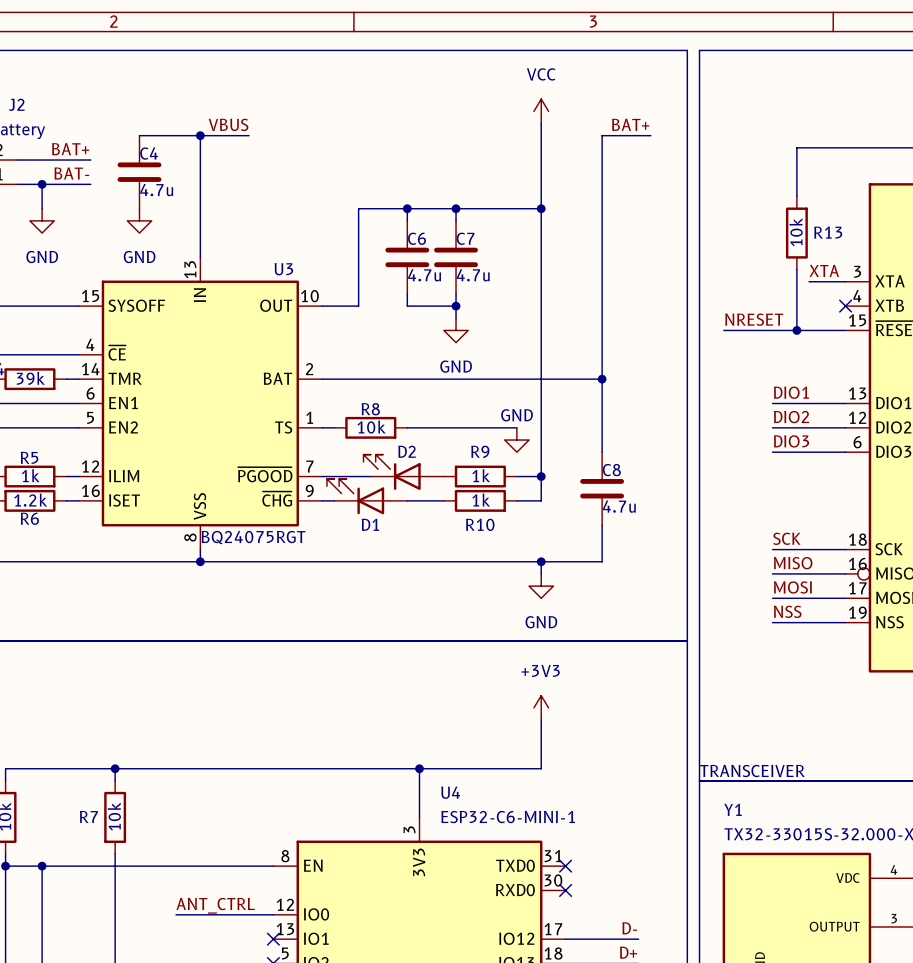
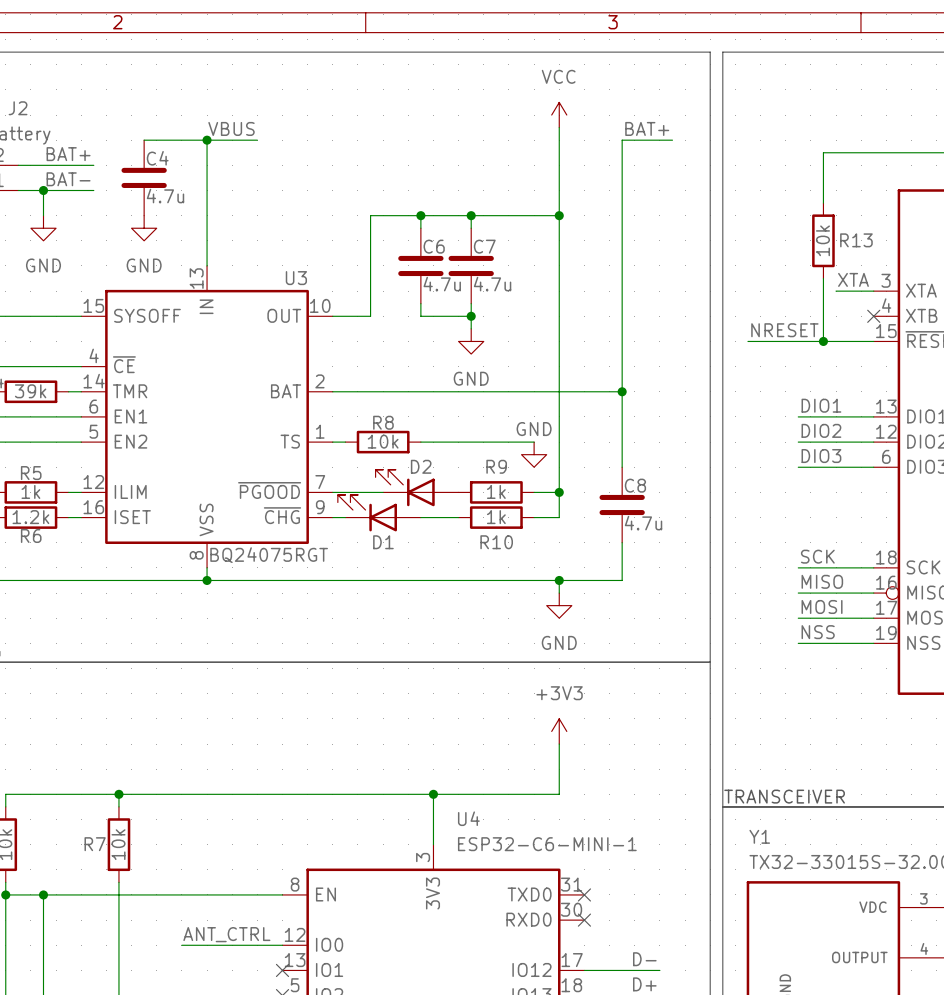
Y1 pin number: 4 (893, 869) -> 3 (923, 898)
Y1 pin number: 3 (894, 918) -> 4 (924, 948)

